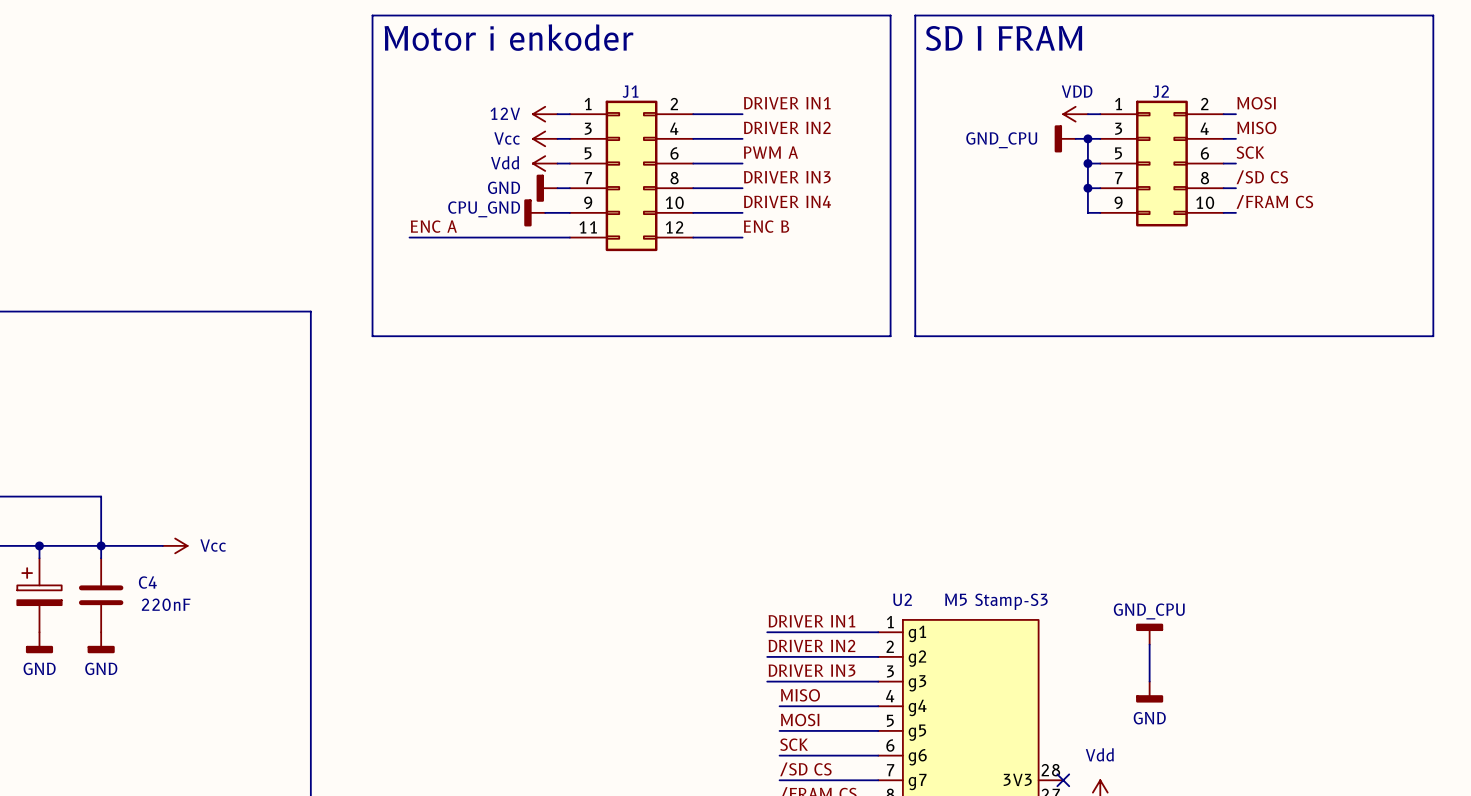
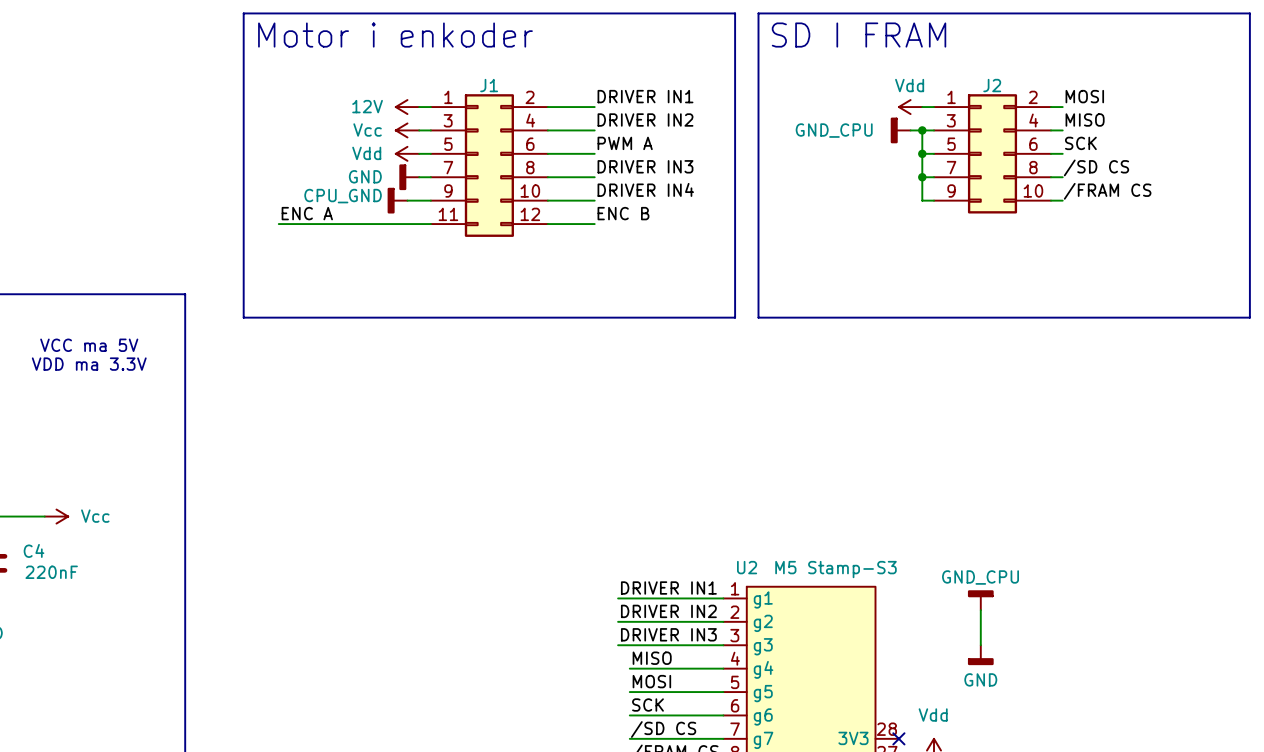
power symbol: VDD (1075, 114) -> Vdd (910, 107)
text: none -> VCC ma 5V (89, 345)
text: none -> VDD ma 3.3V (89, 364)

